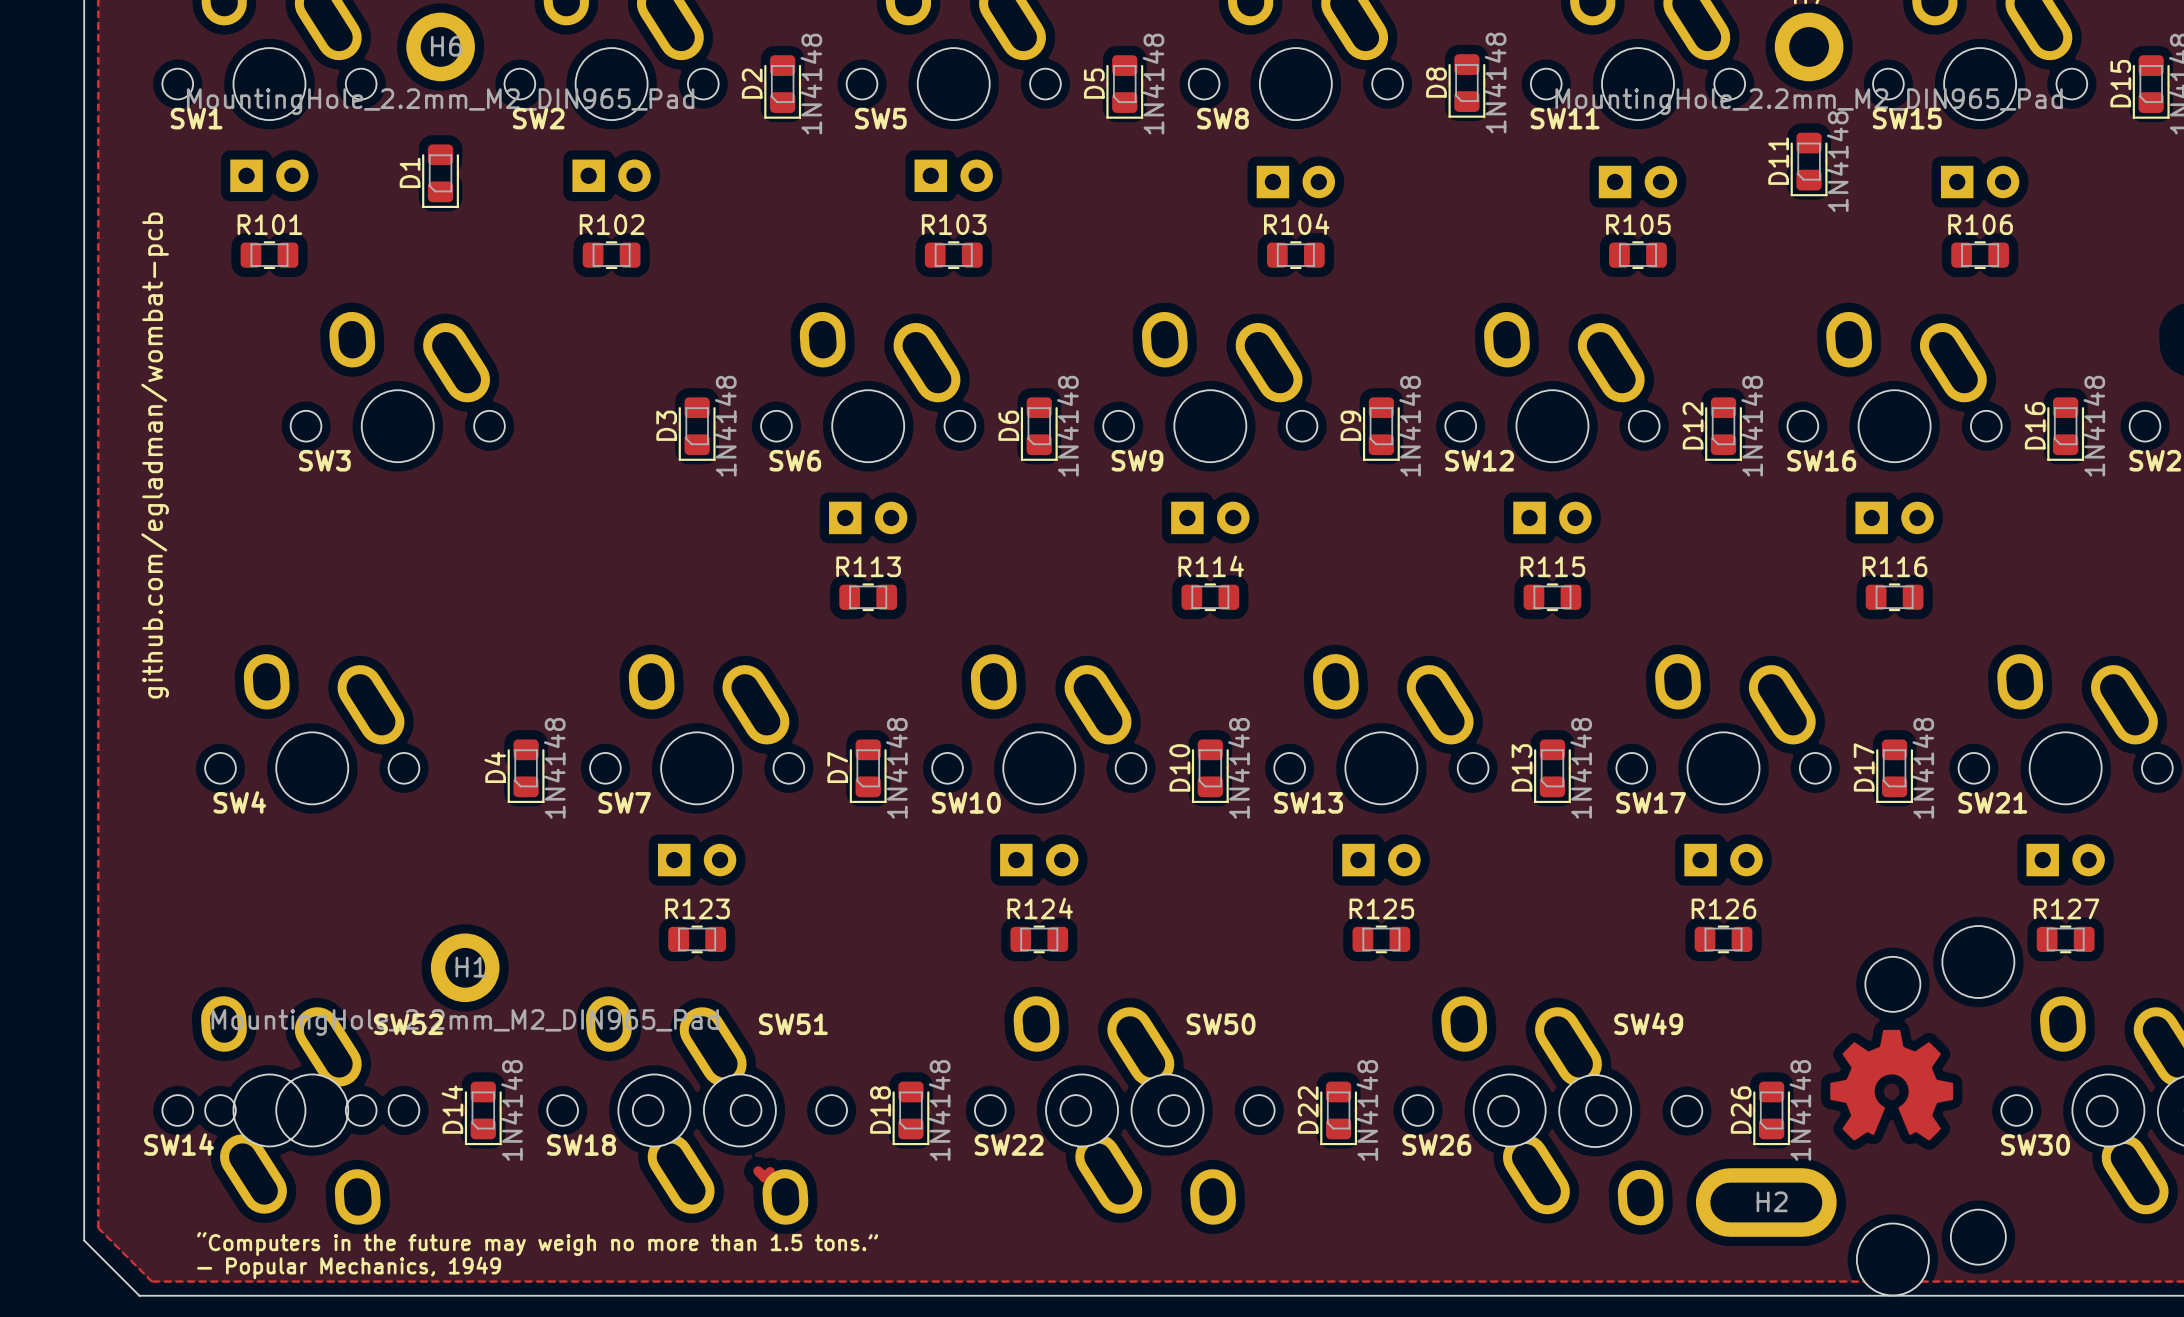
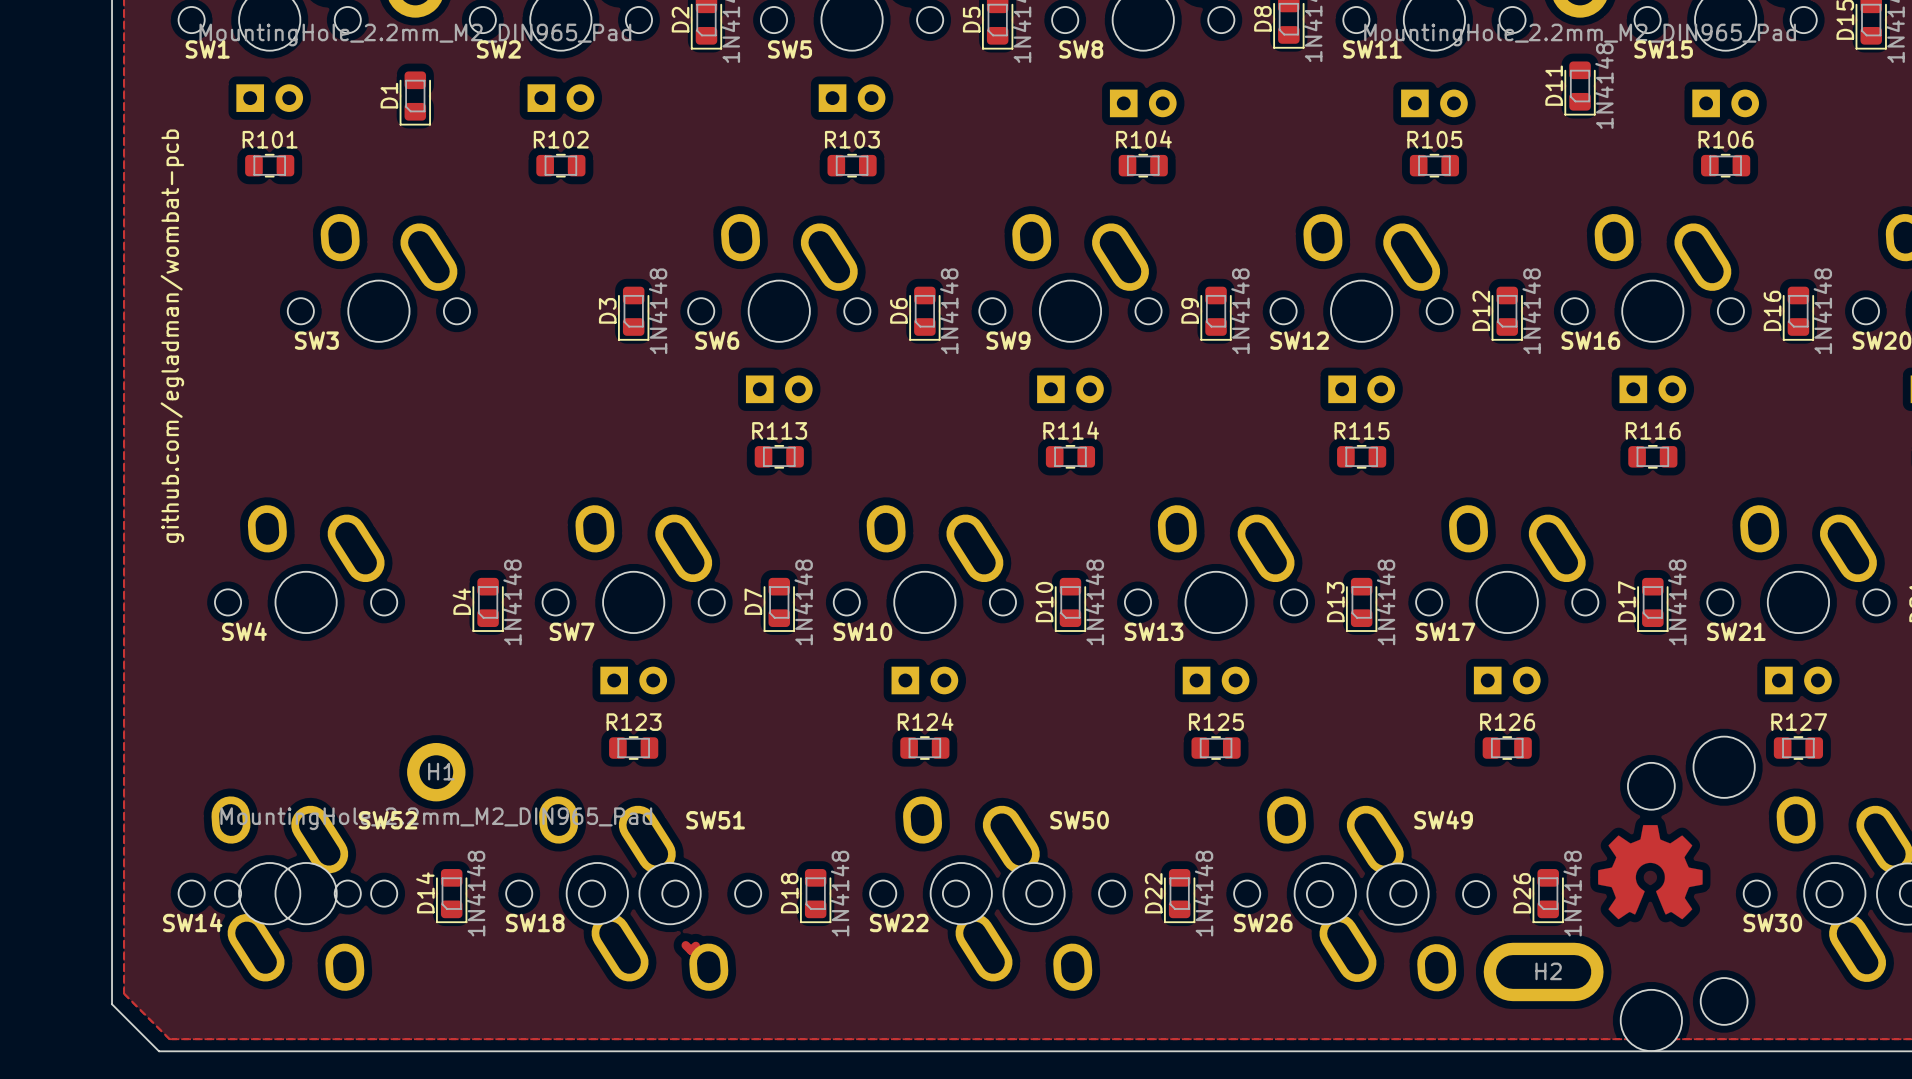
text: “Computers in the future may weigh no more than 1.5 tons.” (537, 1244) -> none
text: — Popular Mechanics, 1949 (349, 1267) -> none

